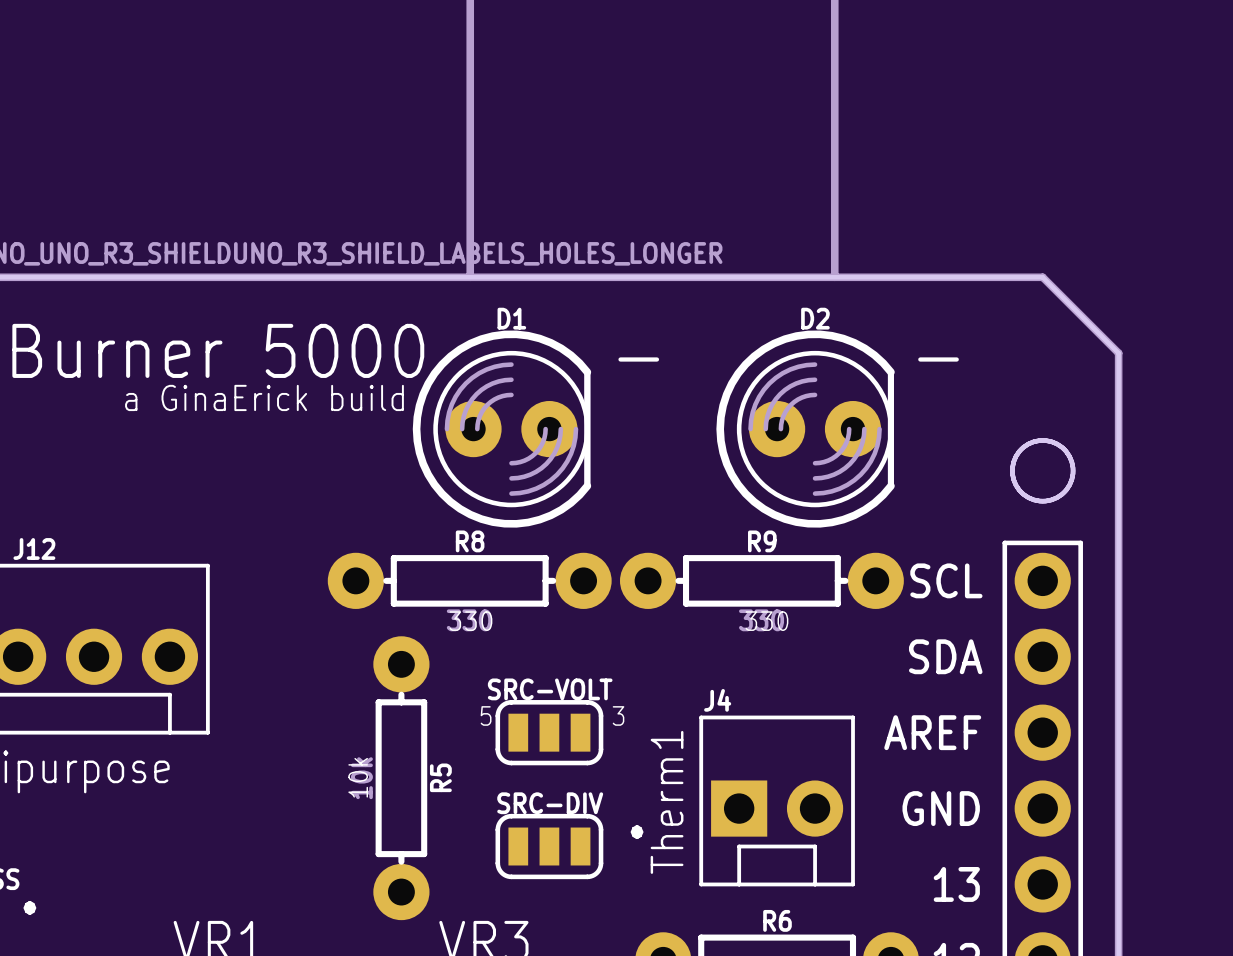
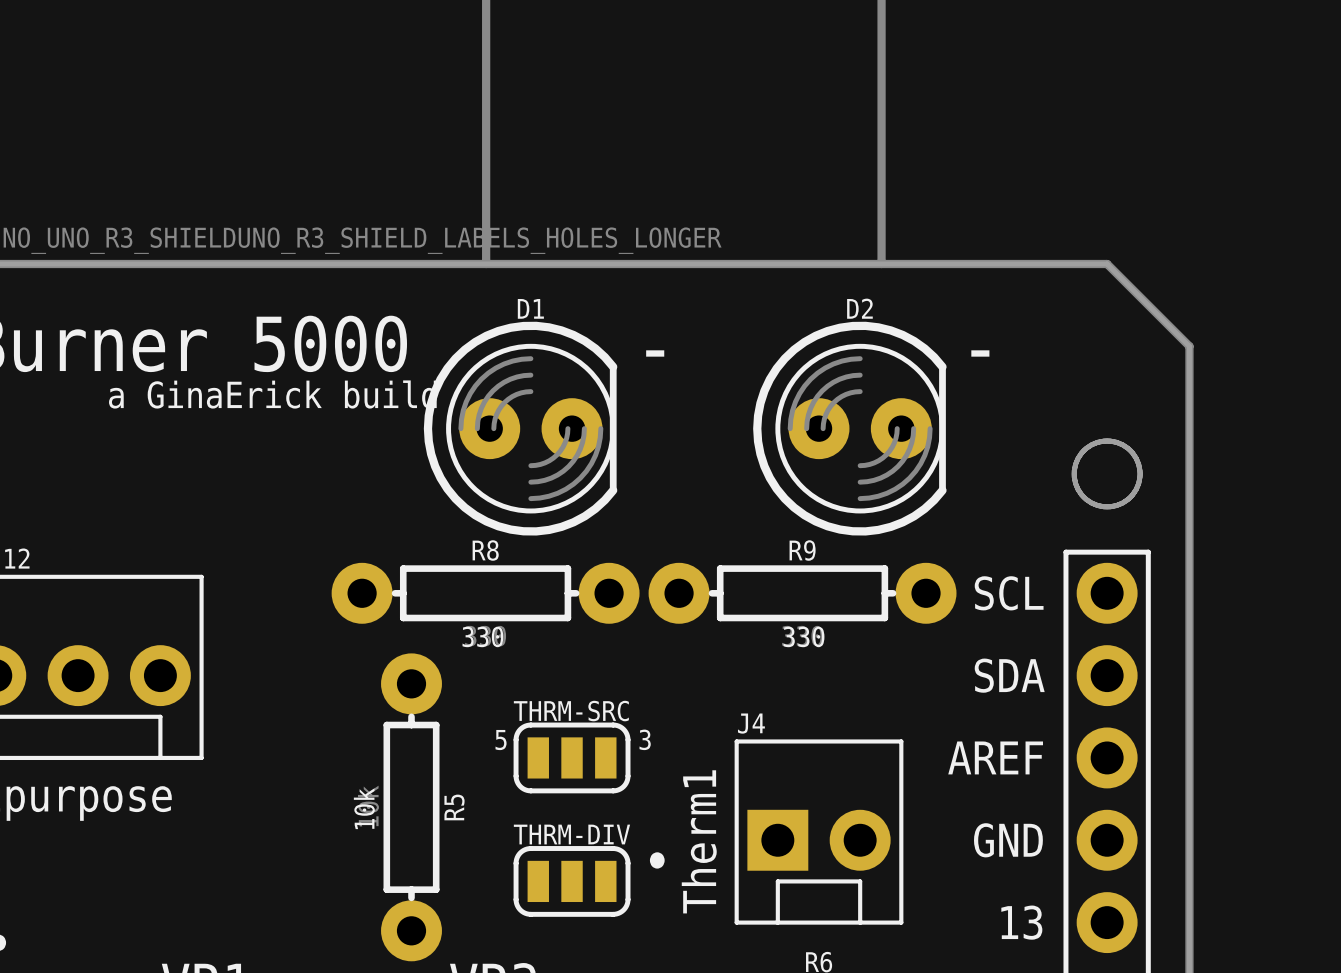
SRC-VOLT name: SRC-VOLT (550, 689) -> THRM-SRC (571, 711)
SRC-DIV name: SRC-DIV (550, 803) -> THRM-DIV (571, 834)

